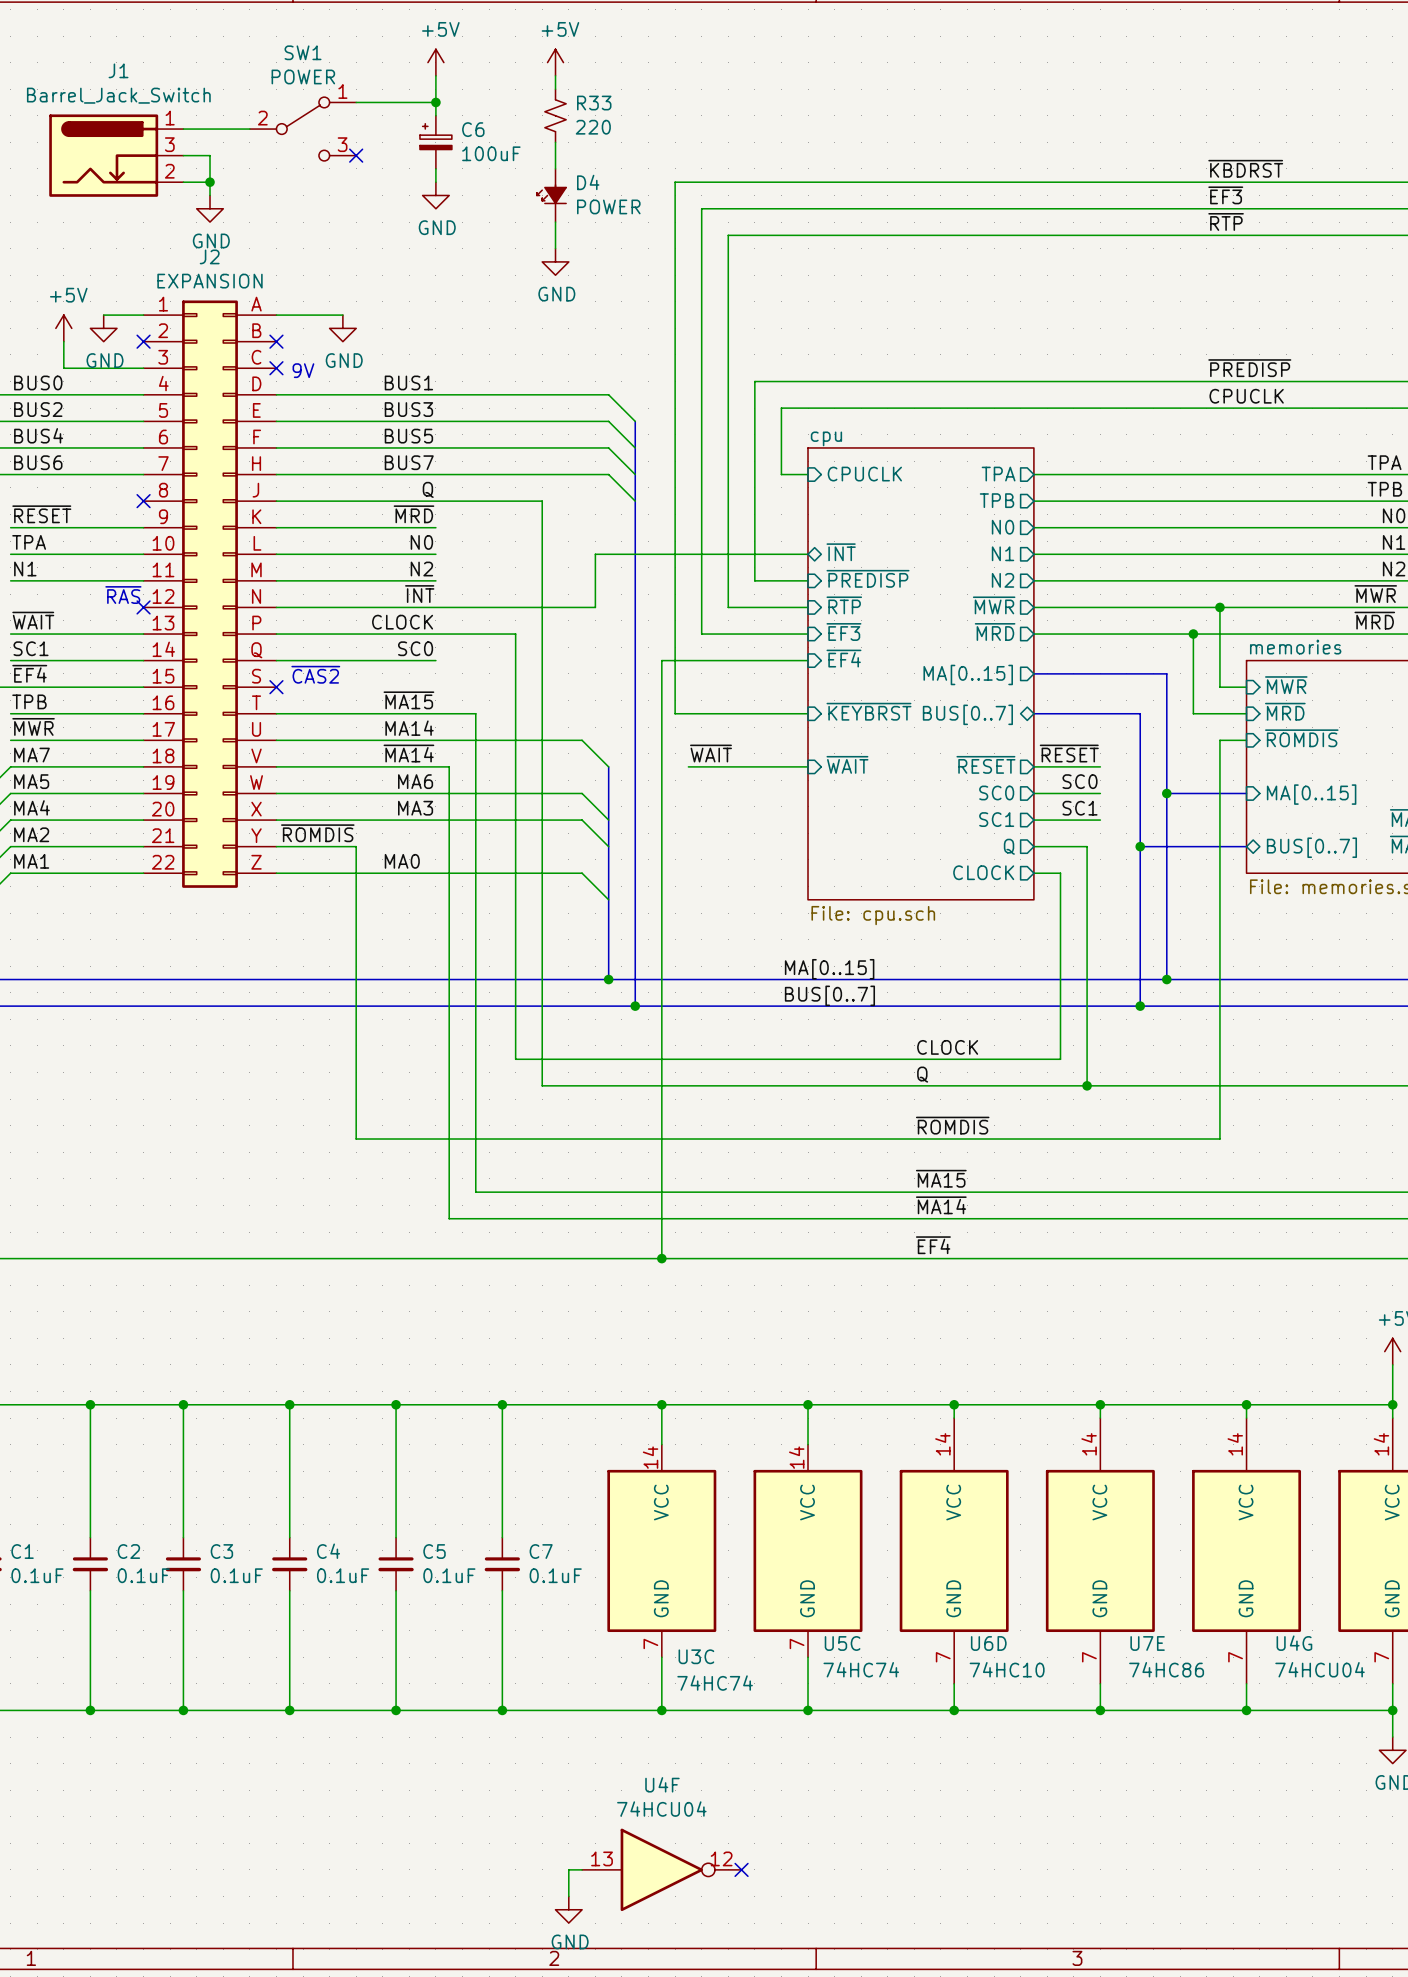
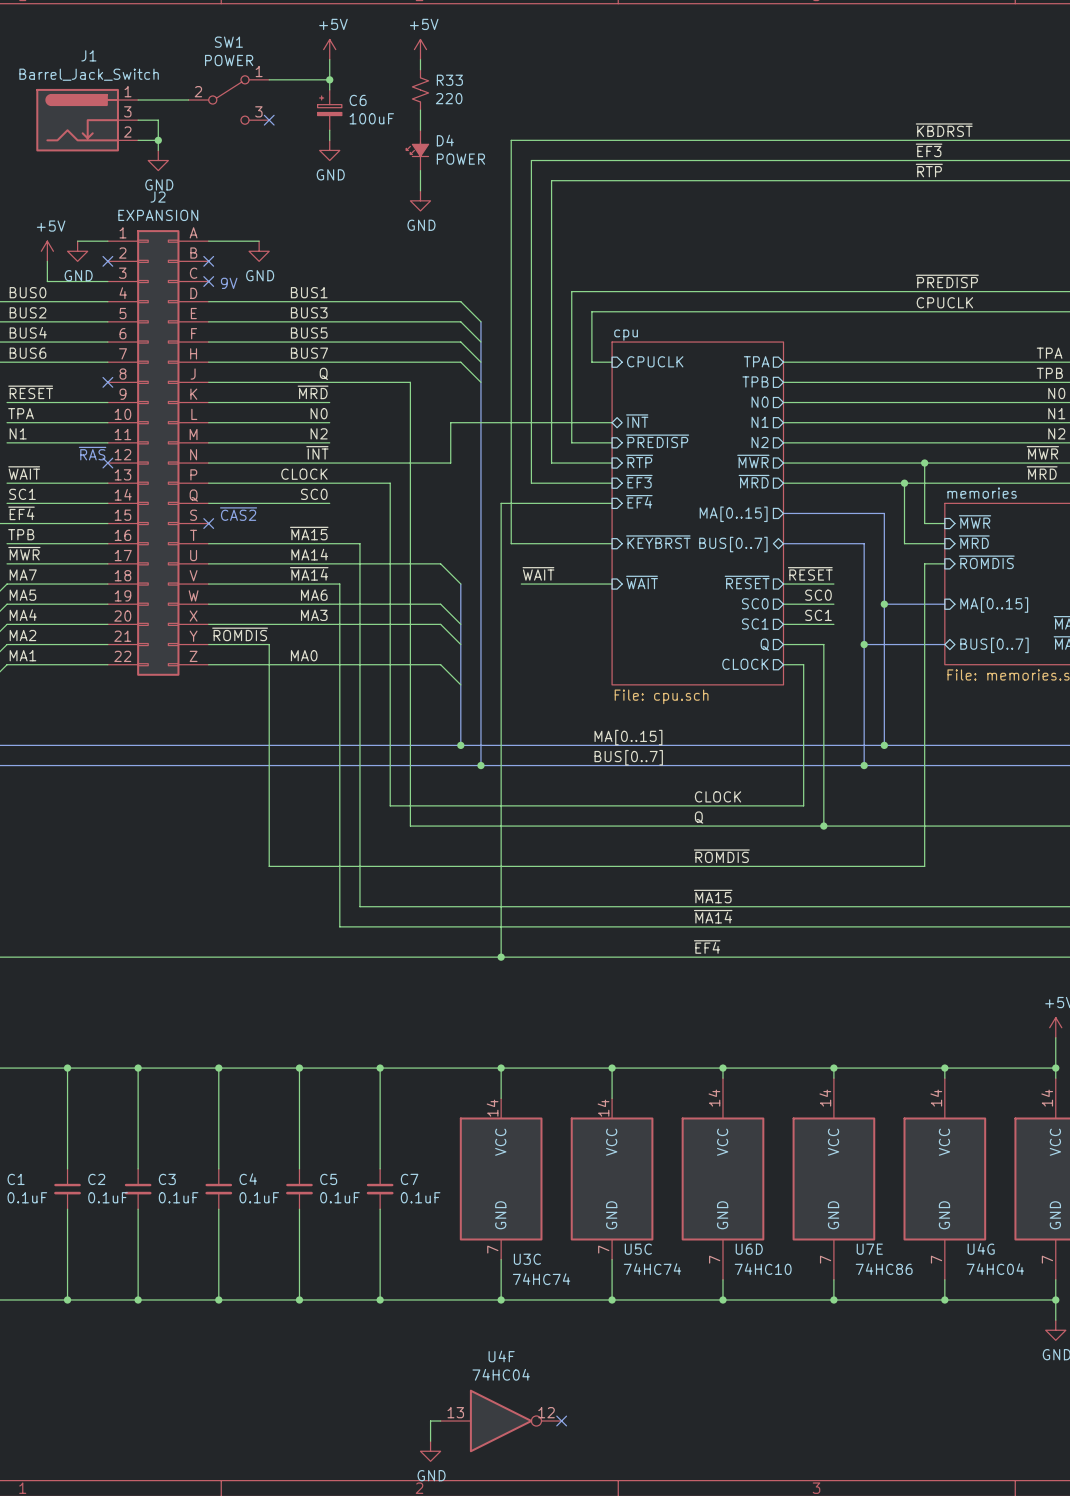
U4G value: 74HCU04 (1320, 1669) -> 74HC04 (995, 1269)
U4F value: 74HCU04 (661, 1809) -> 74HC04 (501, 1374)

